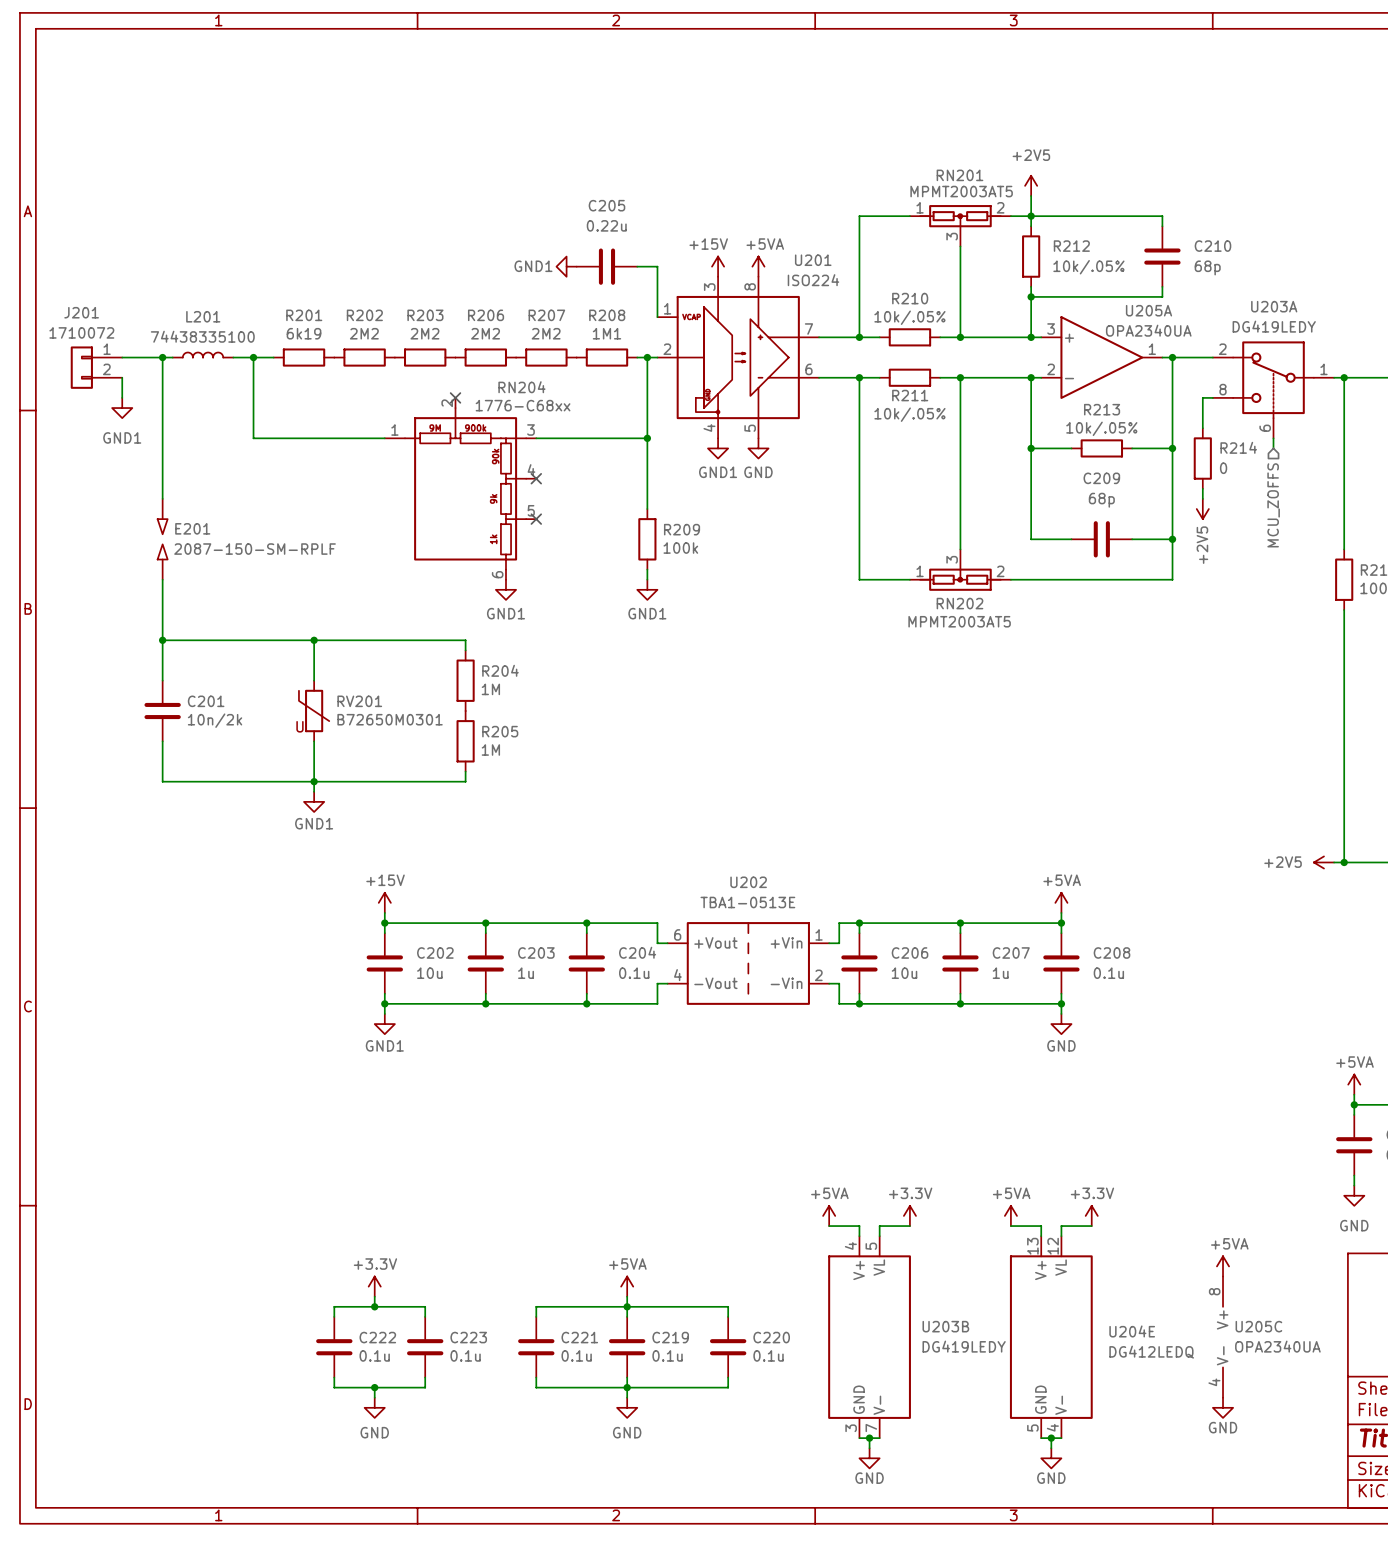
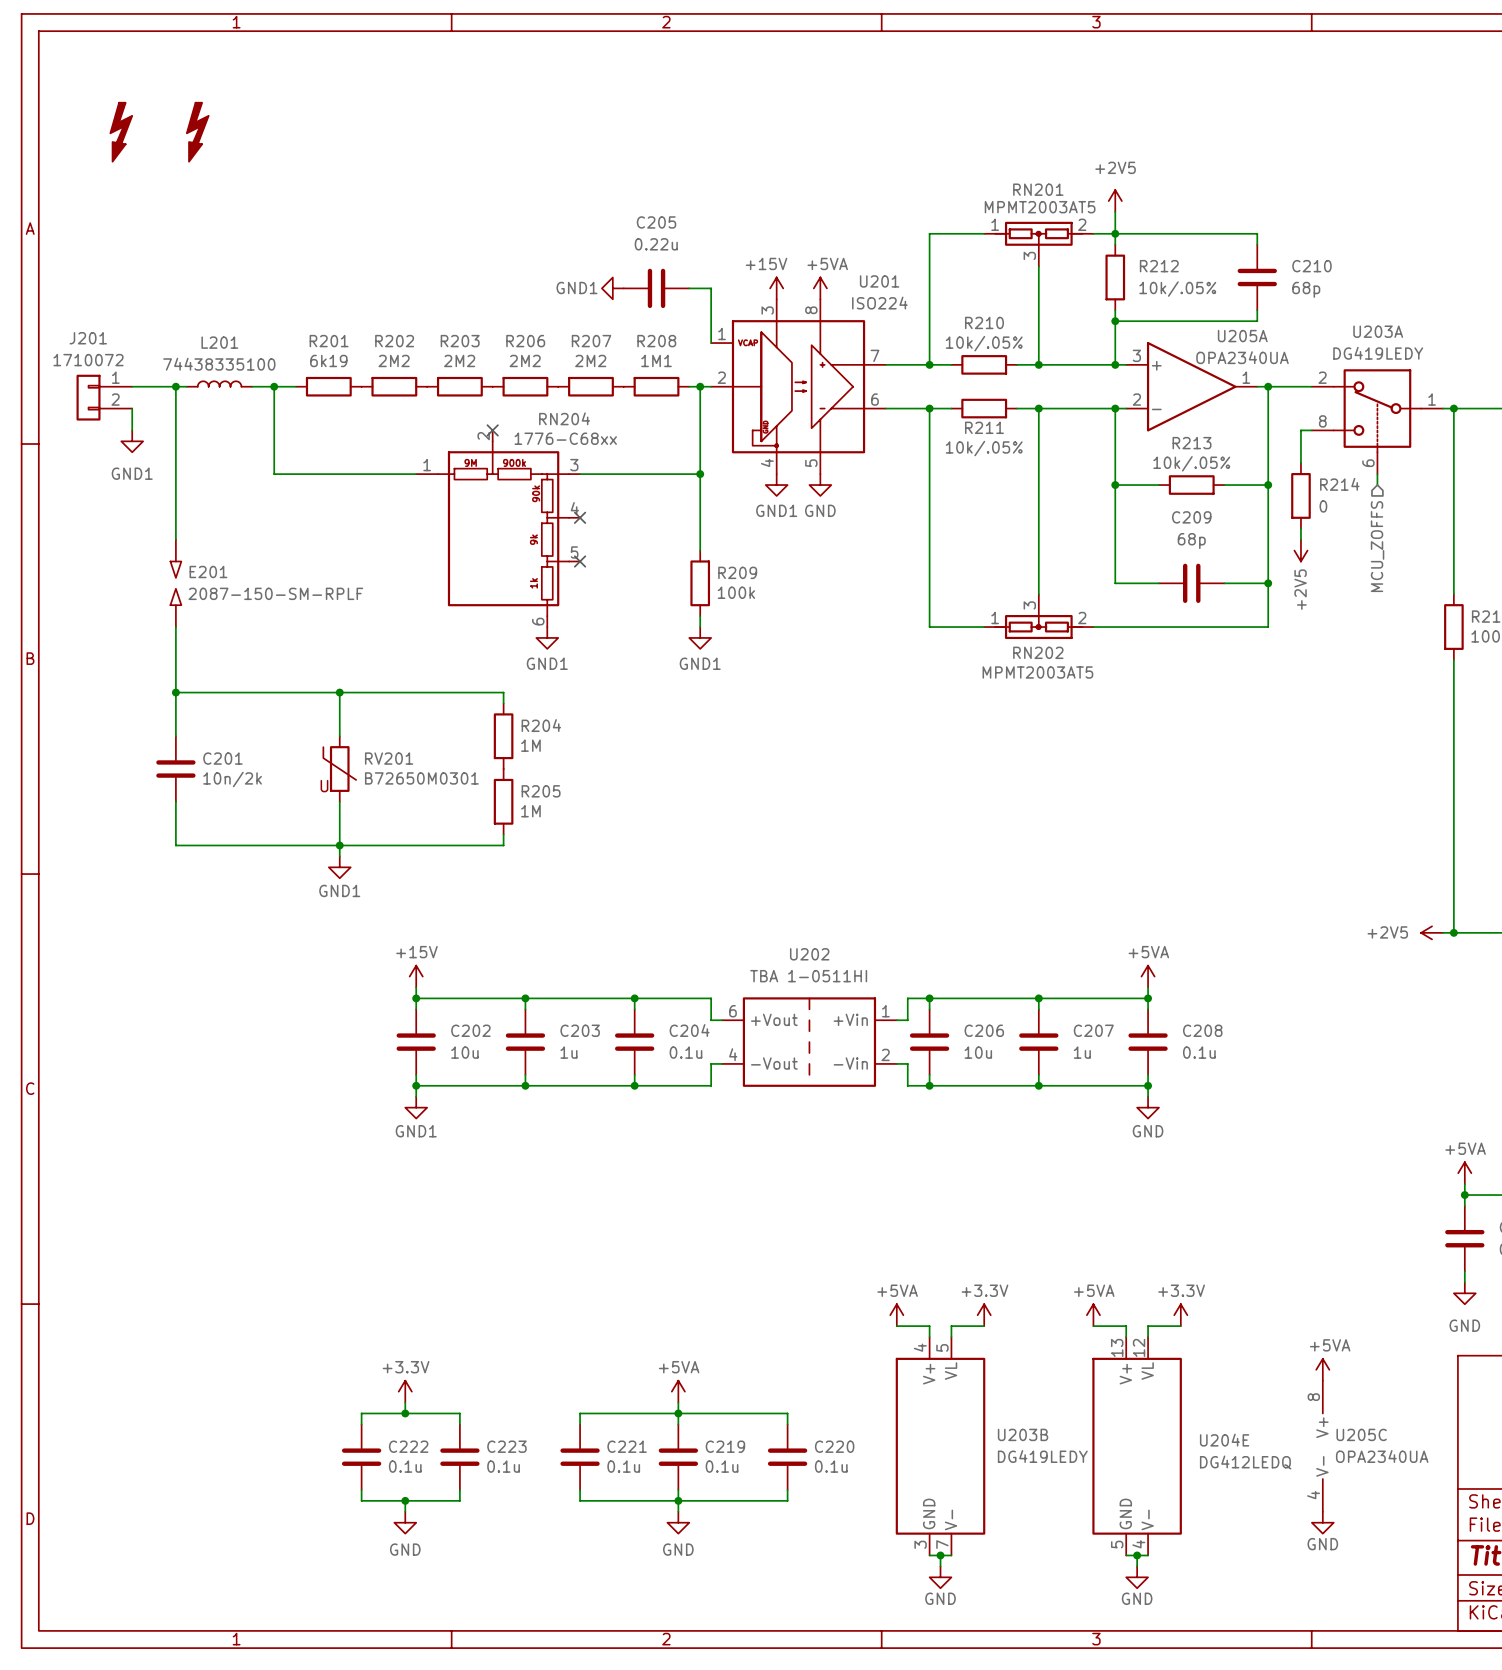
part: none -> (121, 132)
part: none -> (197, 132)
U202 value: TBA1-0513E (747, 902) -> TBA 1-0511HI (808, 976)

